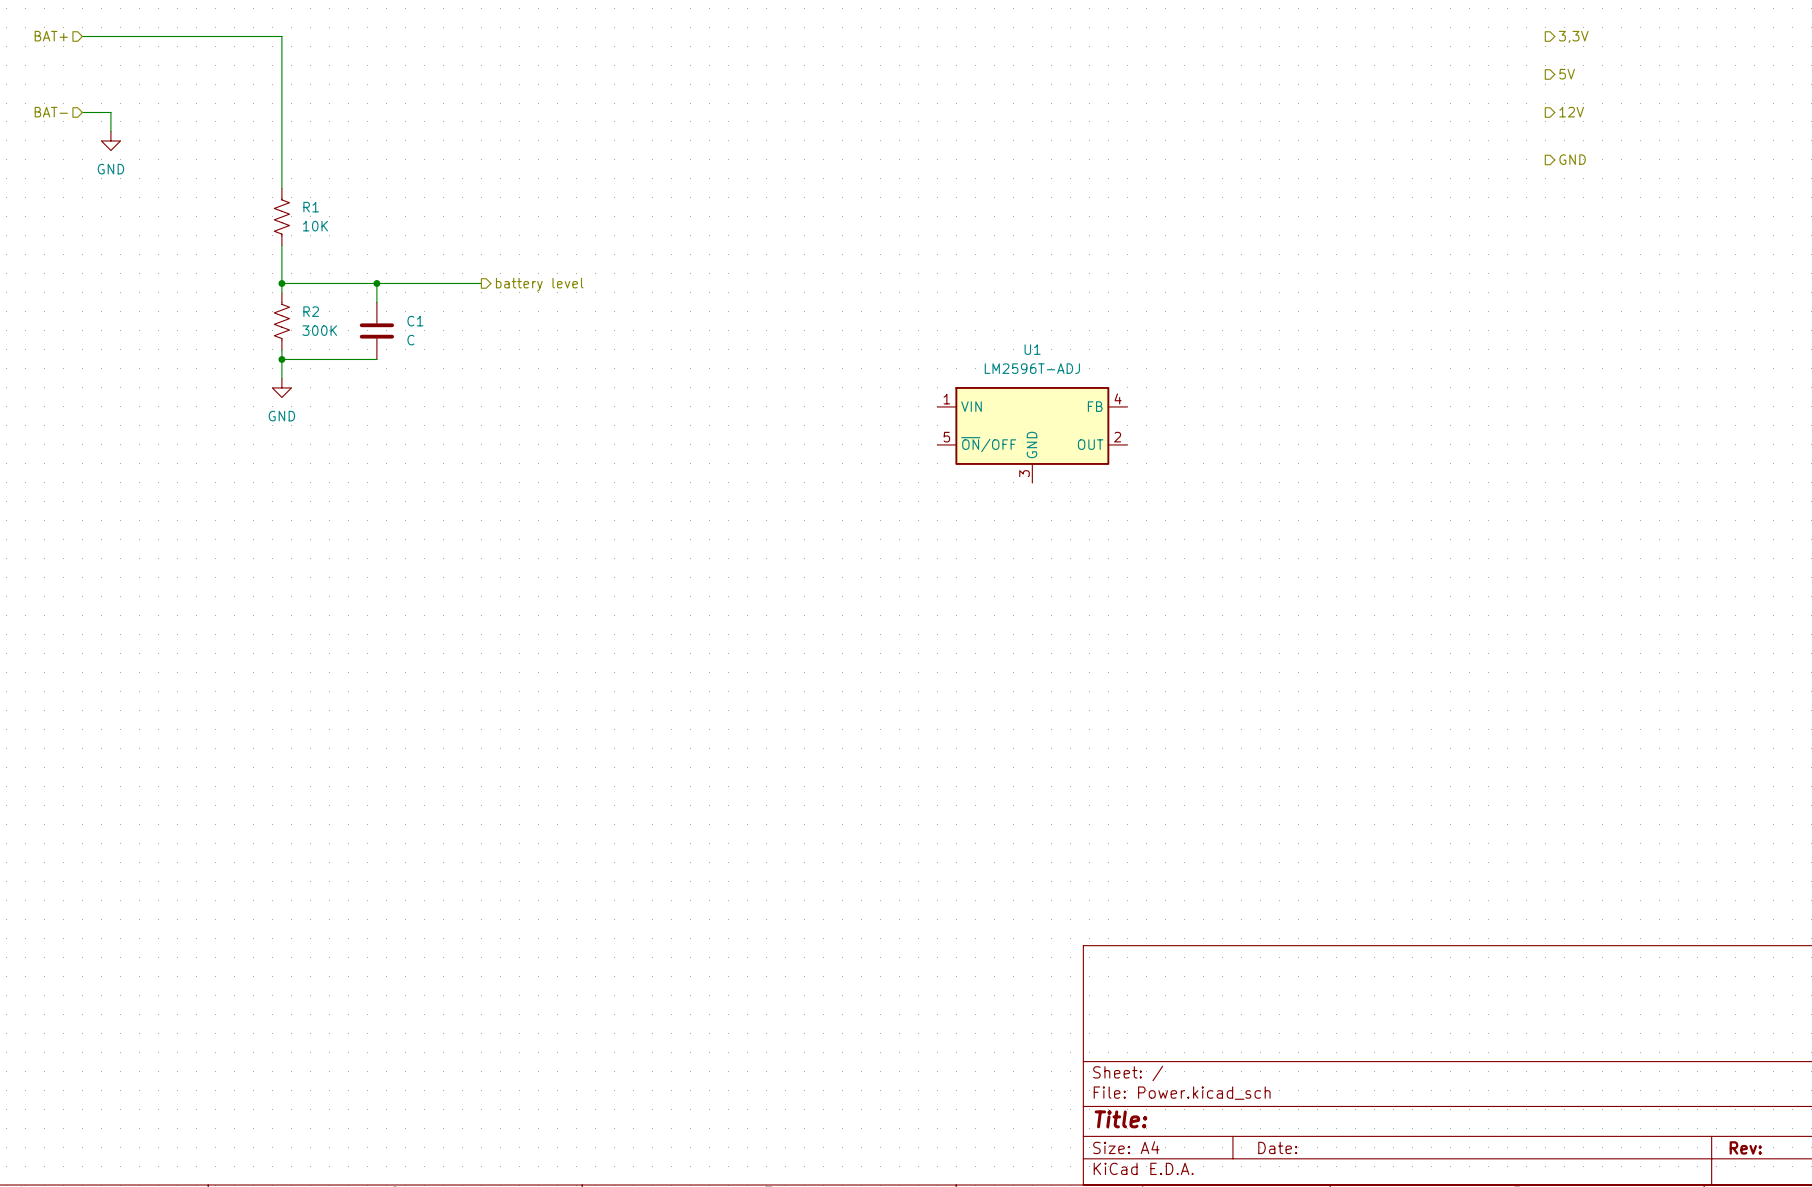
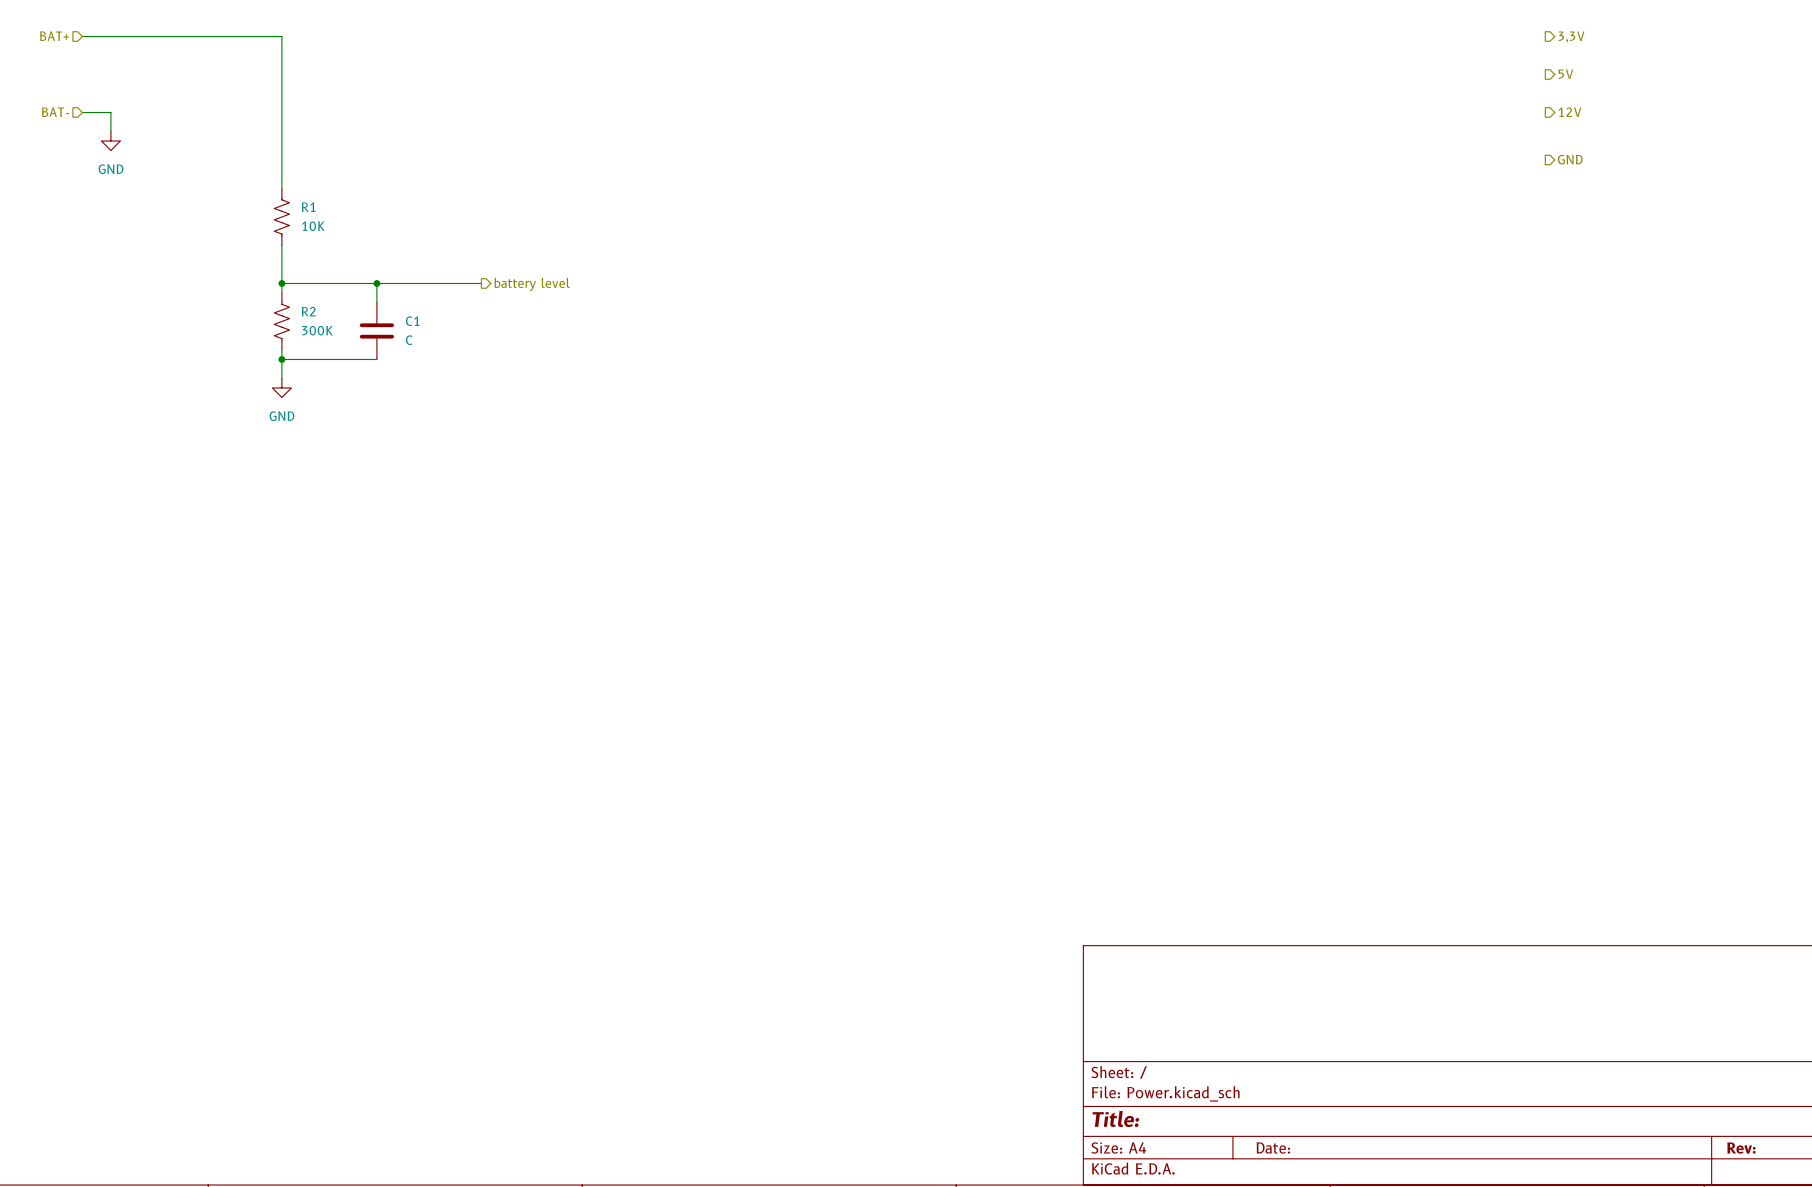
U1: LM2596T-ADJ (1032, 434) -> none

